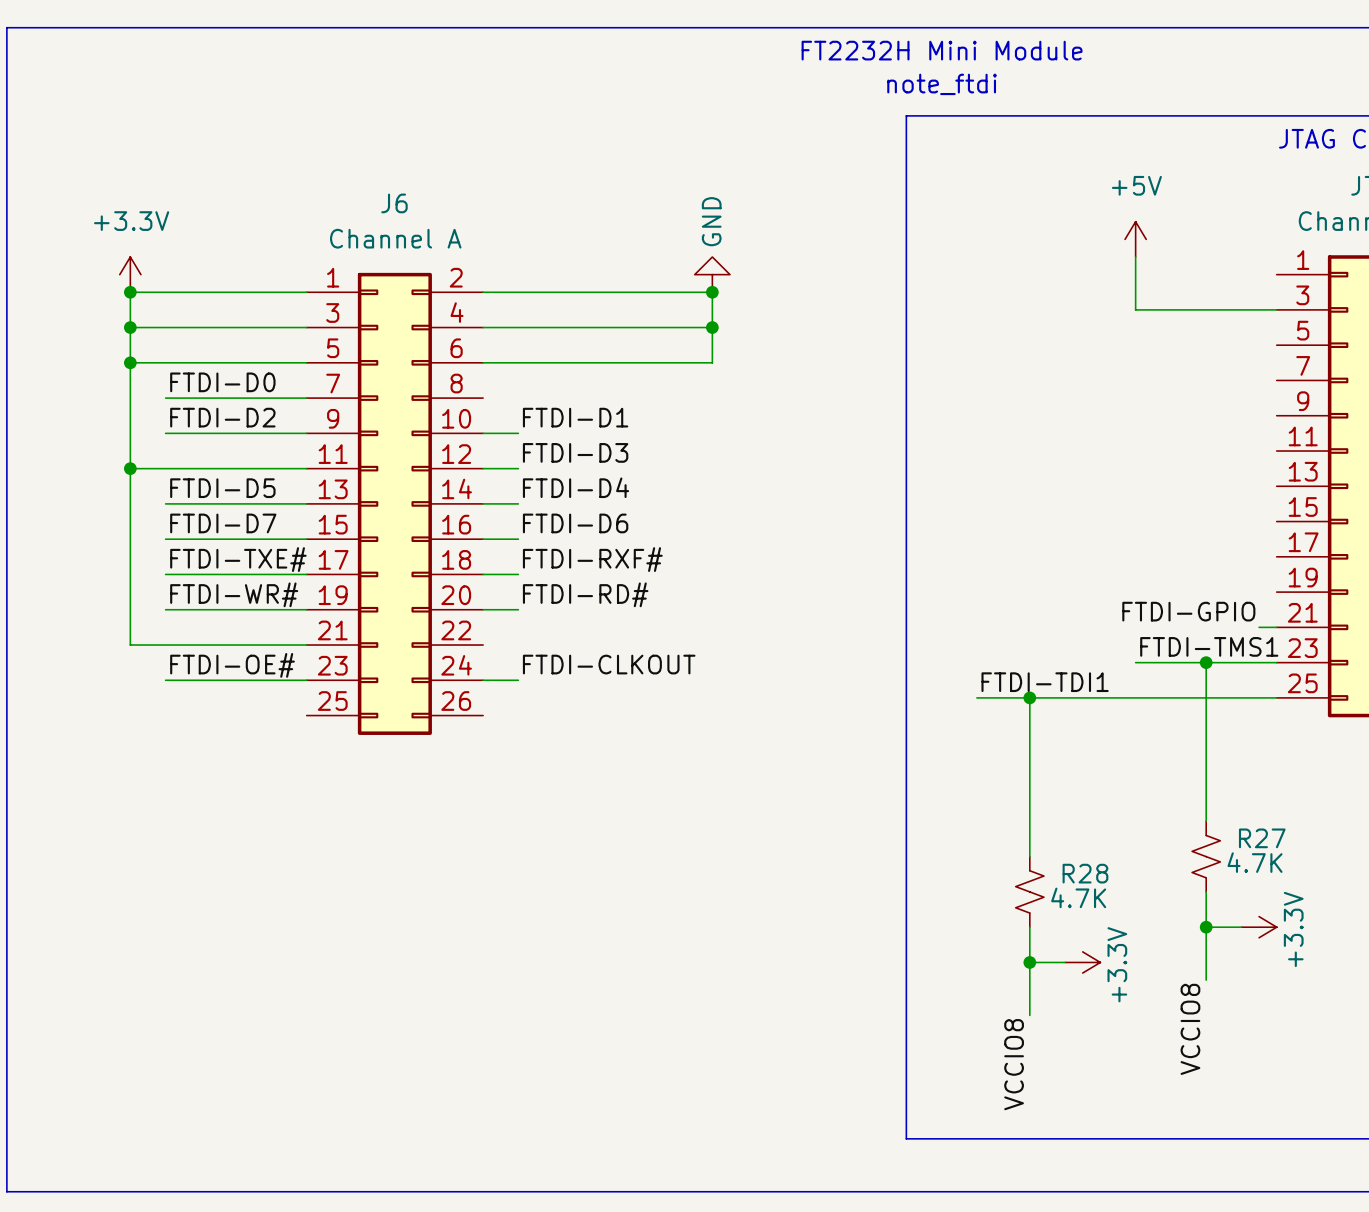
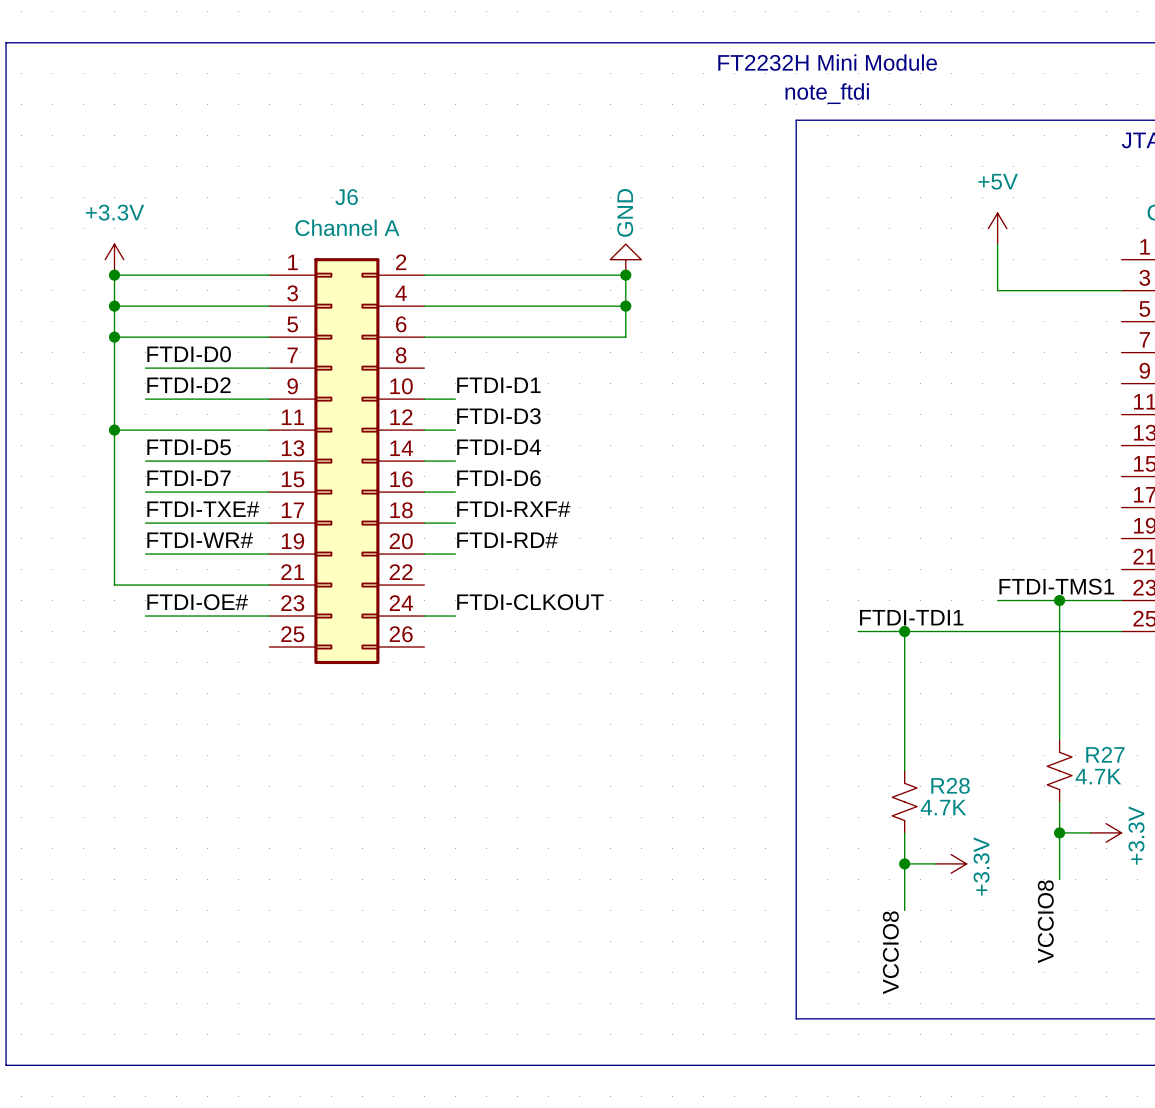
label: FTDI-GPIO (1188, 611) -> none
wire: (1259, 627) (1276, 627) -> none

